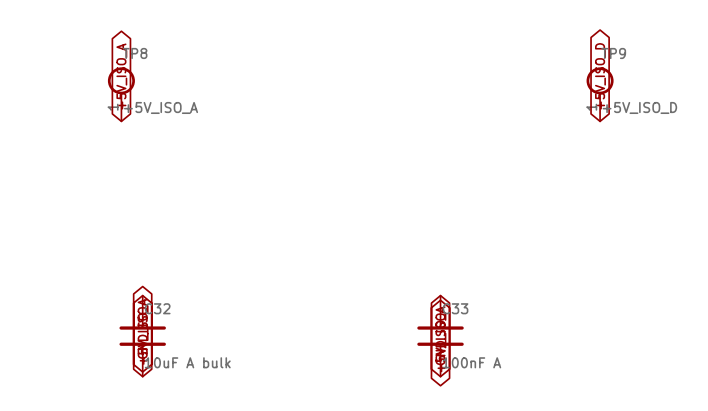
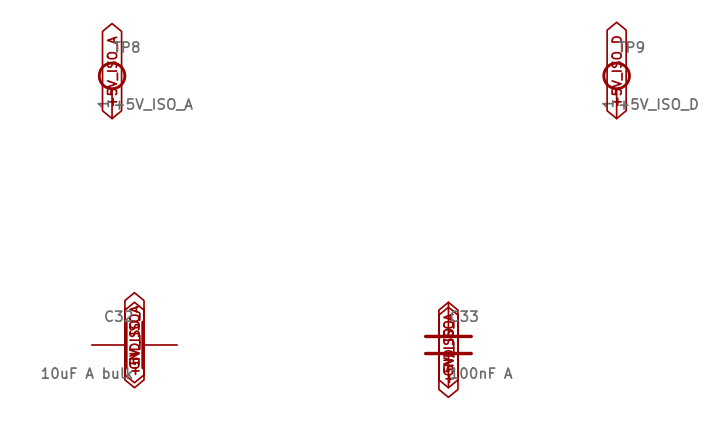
C32 name position: C32 (157, 308) -> C32 (118, 316)
C32 rotation: 0° (142, 336) -> 90° clockwise (134, 344)
C32 value position: 10uF A bulk (187, 362) -> 10uF A bulk (86, 373)

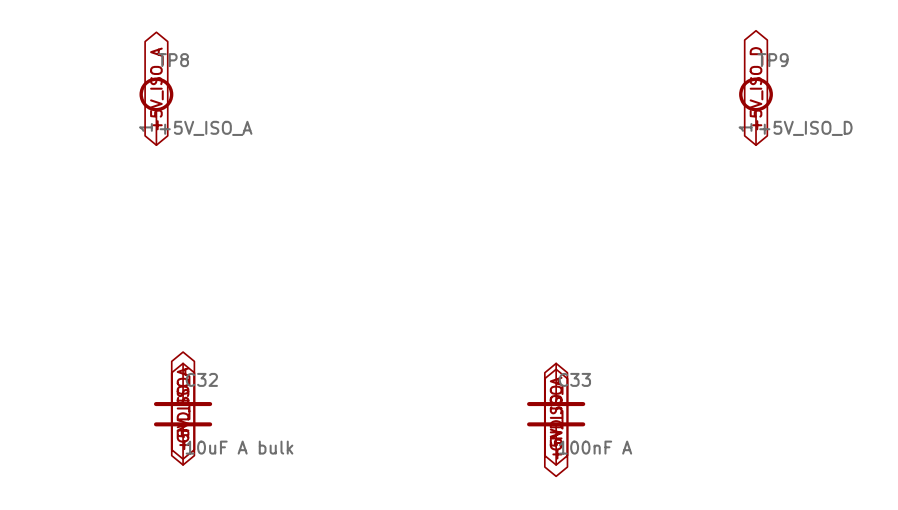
C32 rotation: 0° (134, 344) -> 90° clockwise (183, 414)
C32 value position: 10uF A bulk (86, 373) -> 10uF A bulk (239, 447)

